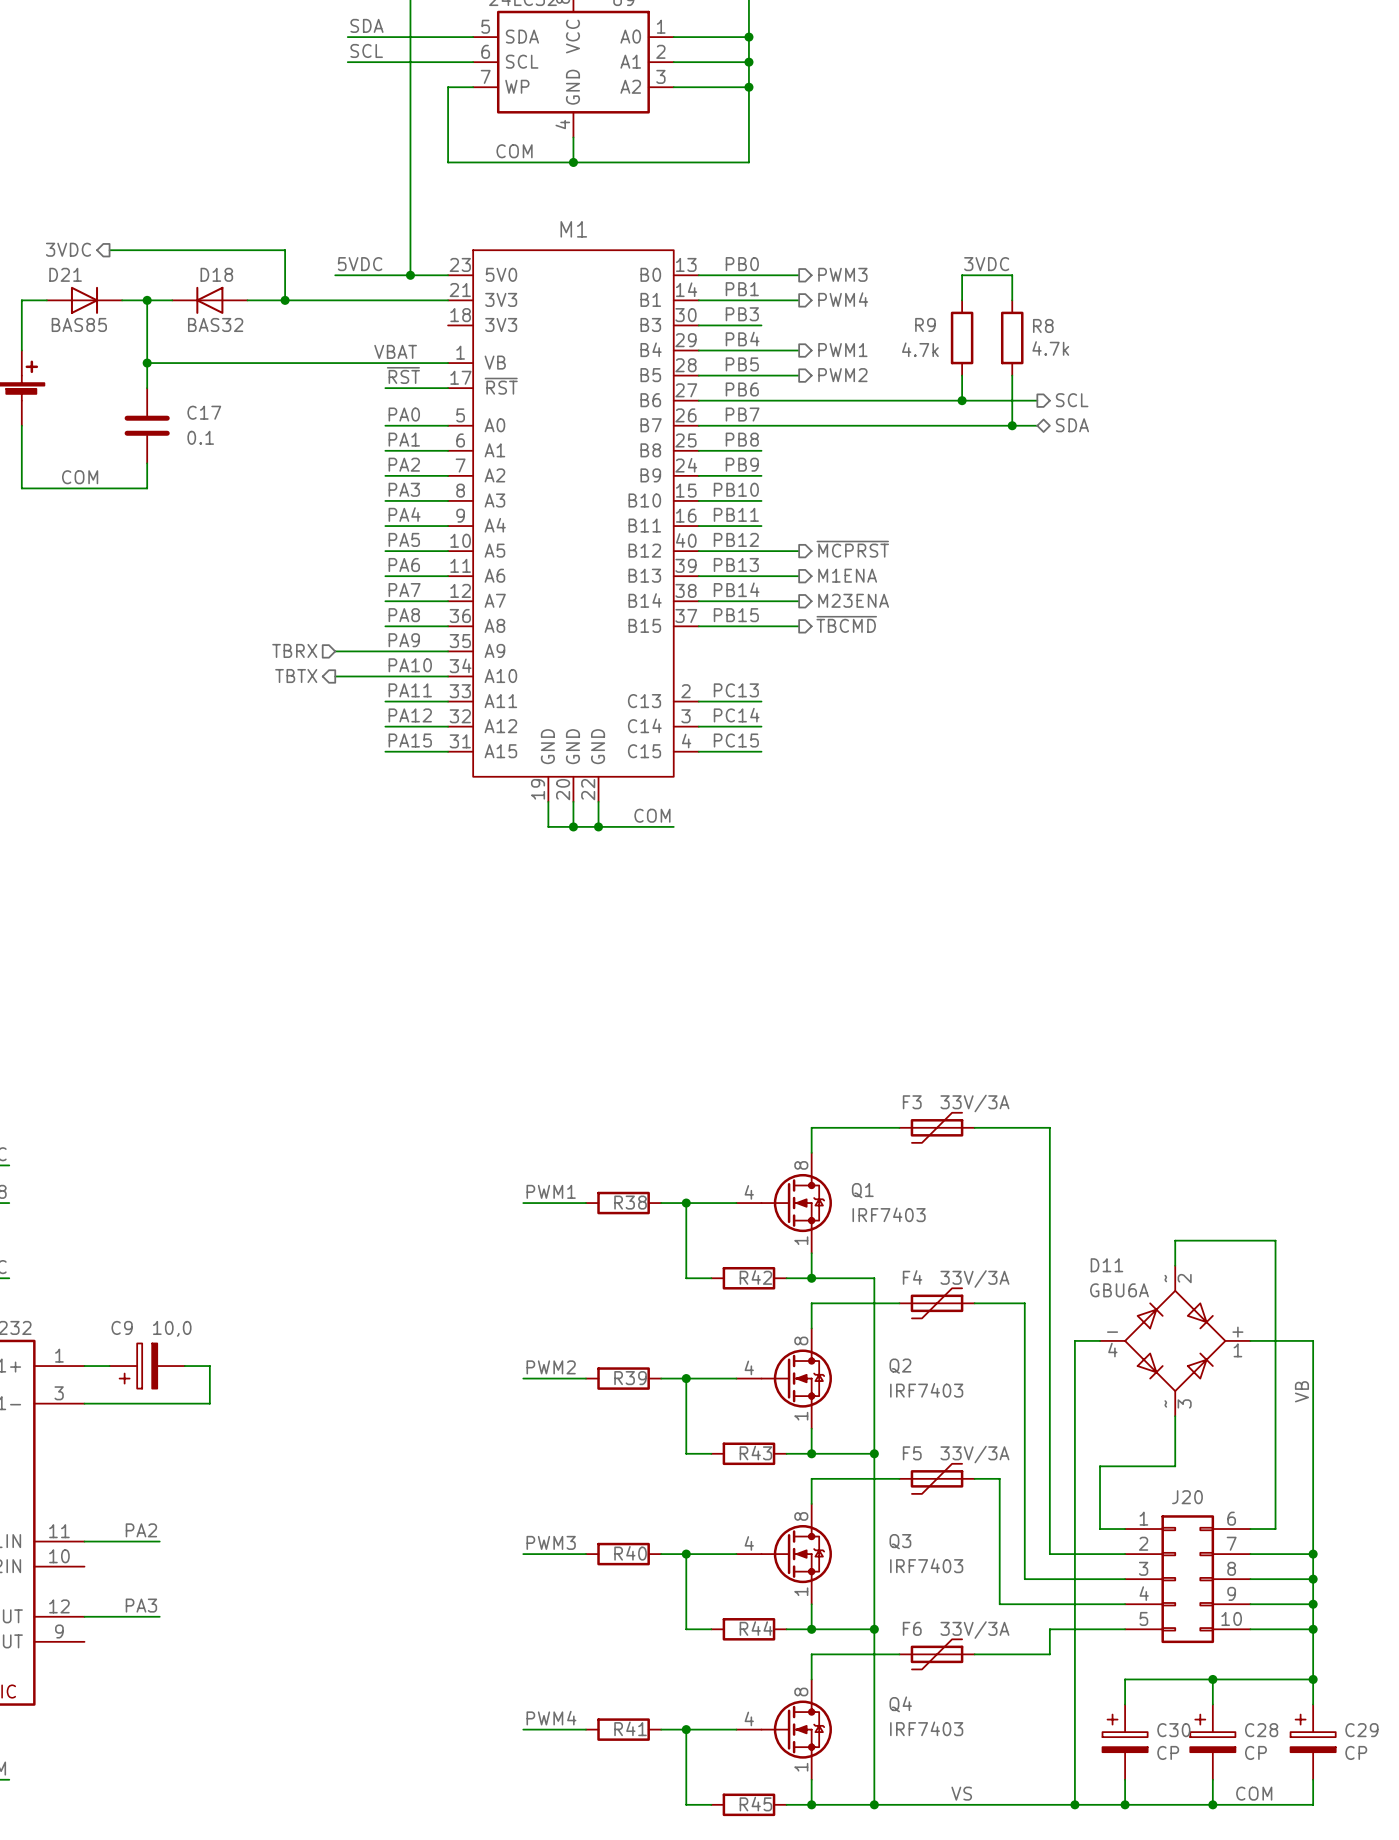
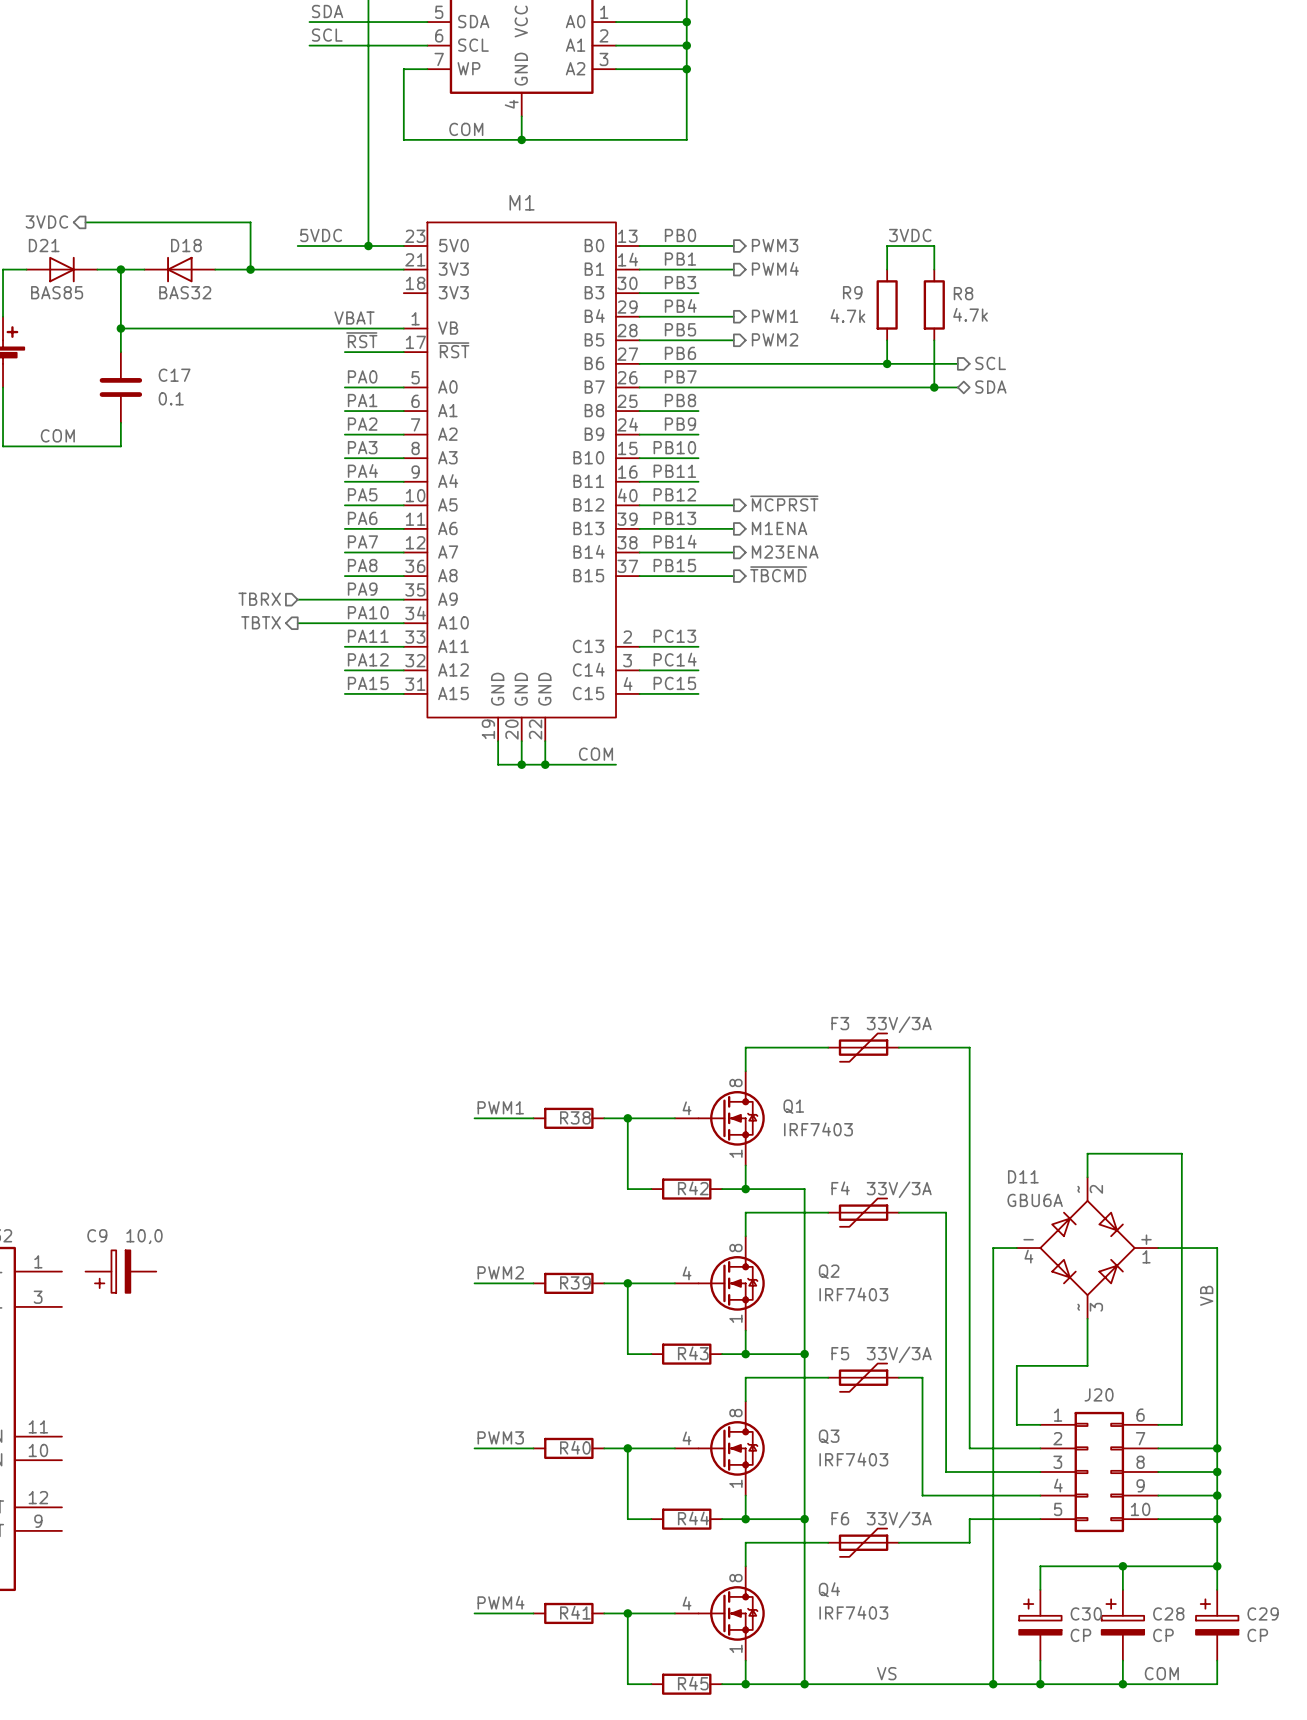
wire: (84, 1366) (109, 1366) -> none
wire: (184, 1366) (209, 1366) (209, 1403) (84, 1403) -> none
label: PA2 (141, 1530) -> none
wire: (84, 1541) (159, 1541) -> none
label: PA3 (141, 1605) -> none
wire: (84, 1616) (159, 1616) -> none

